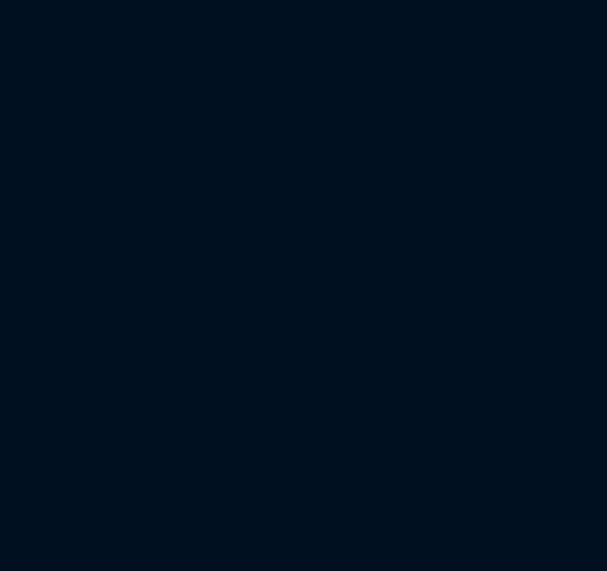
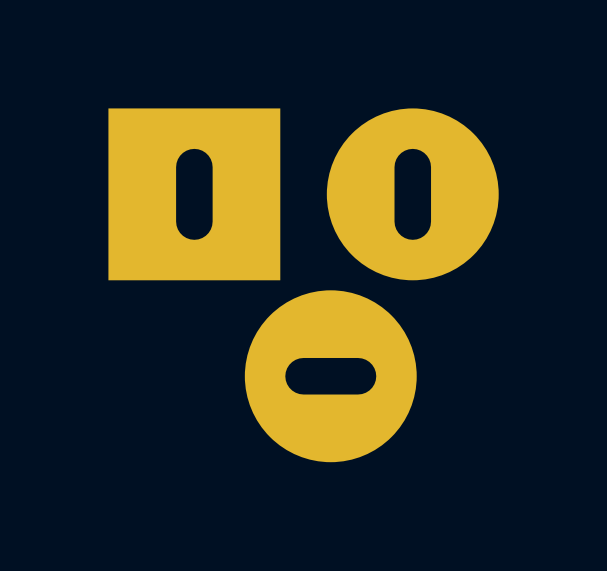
part: none -> (303, 285)

